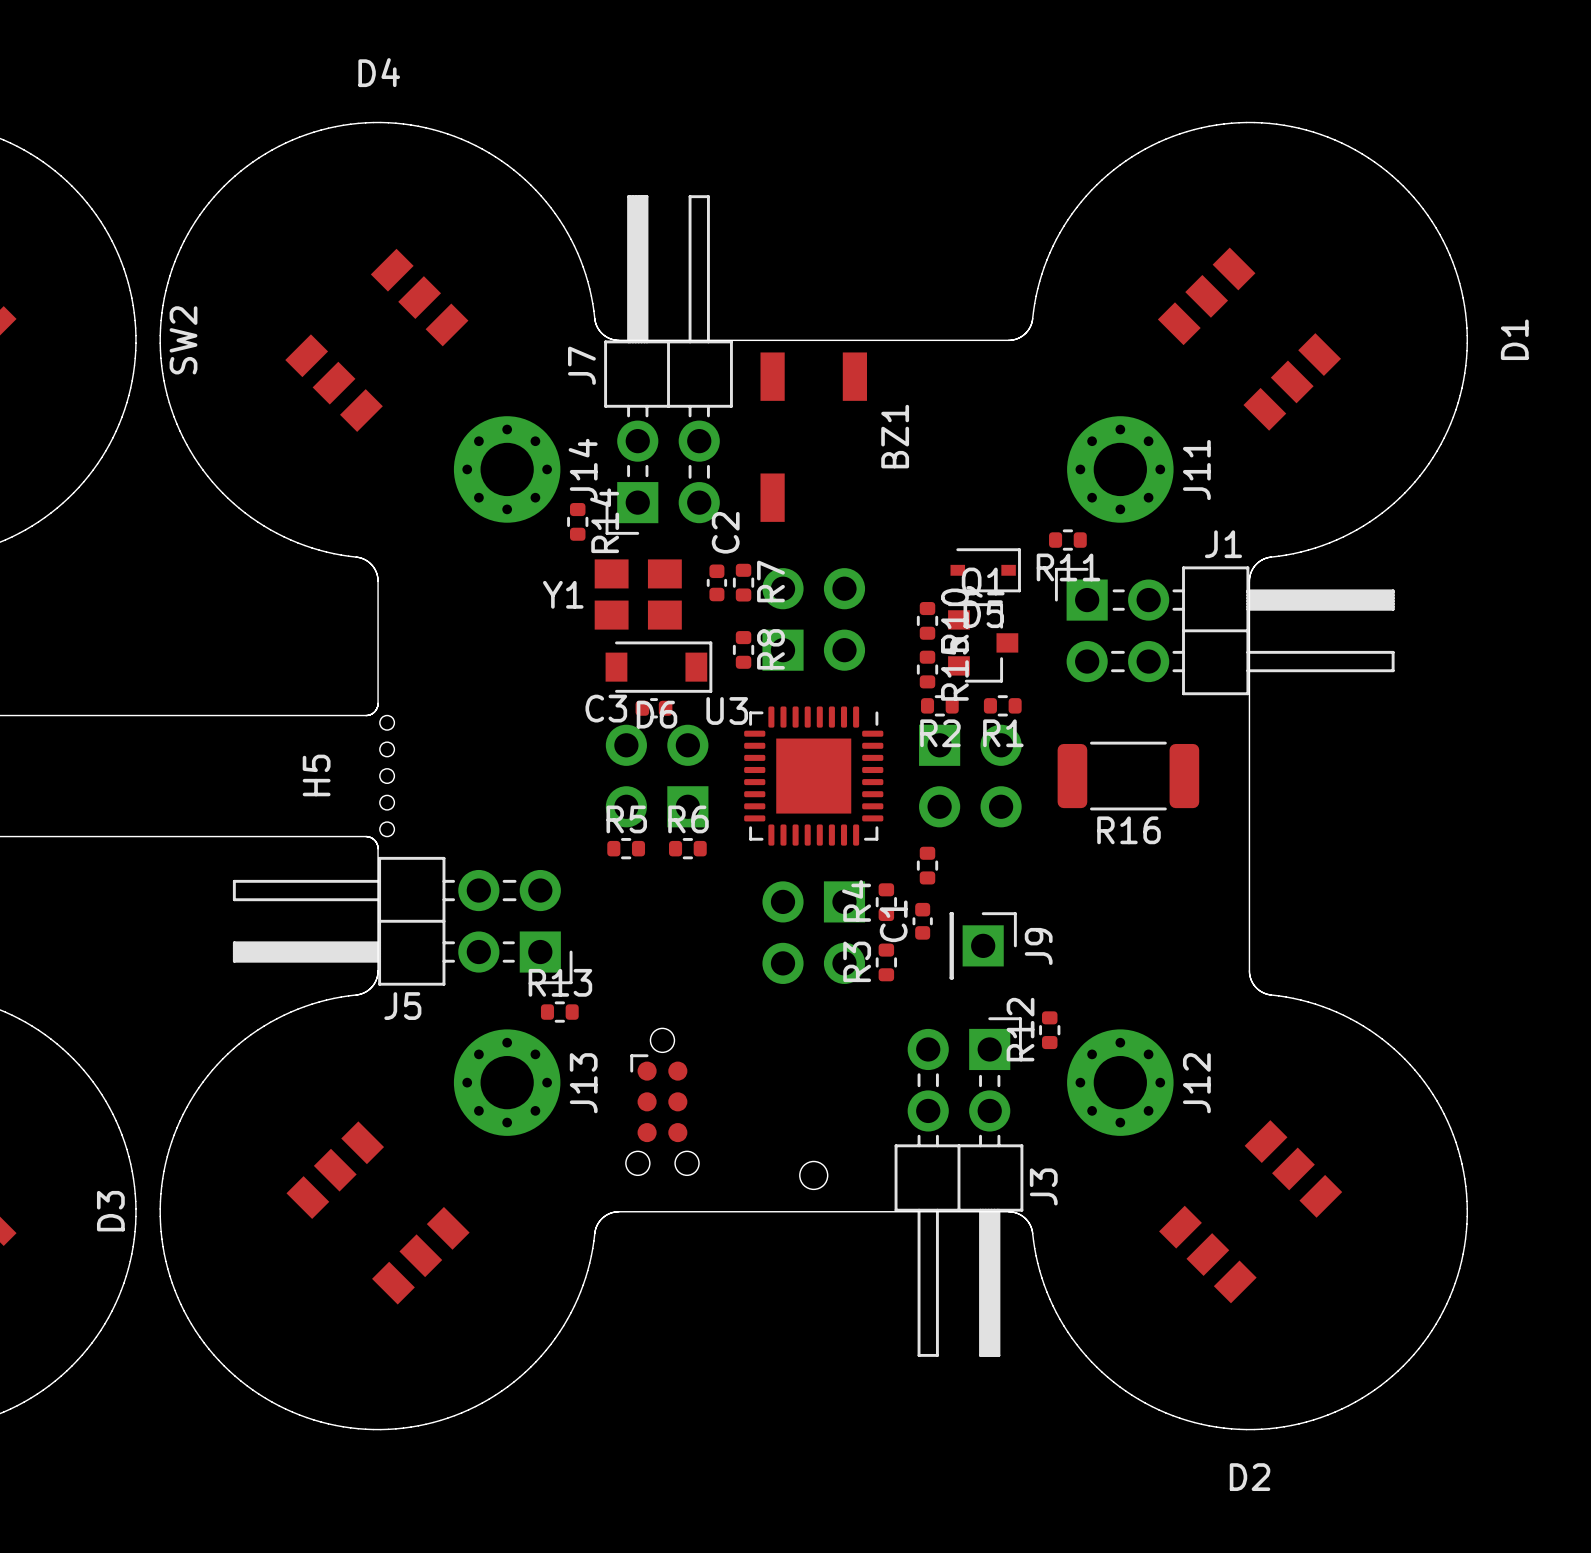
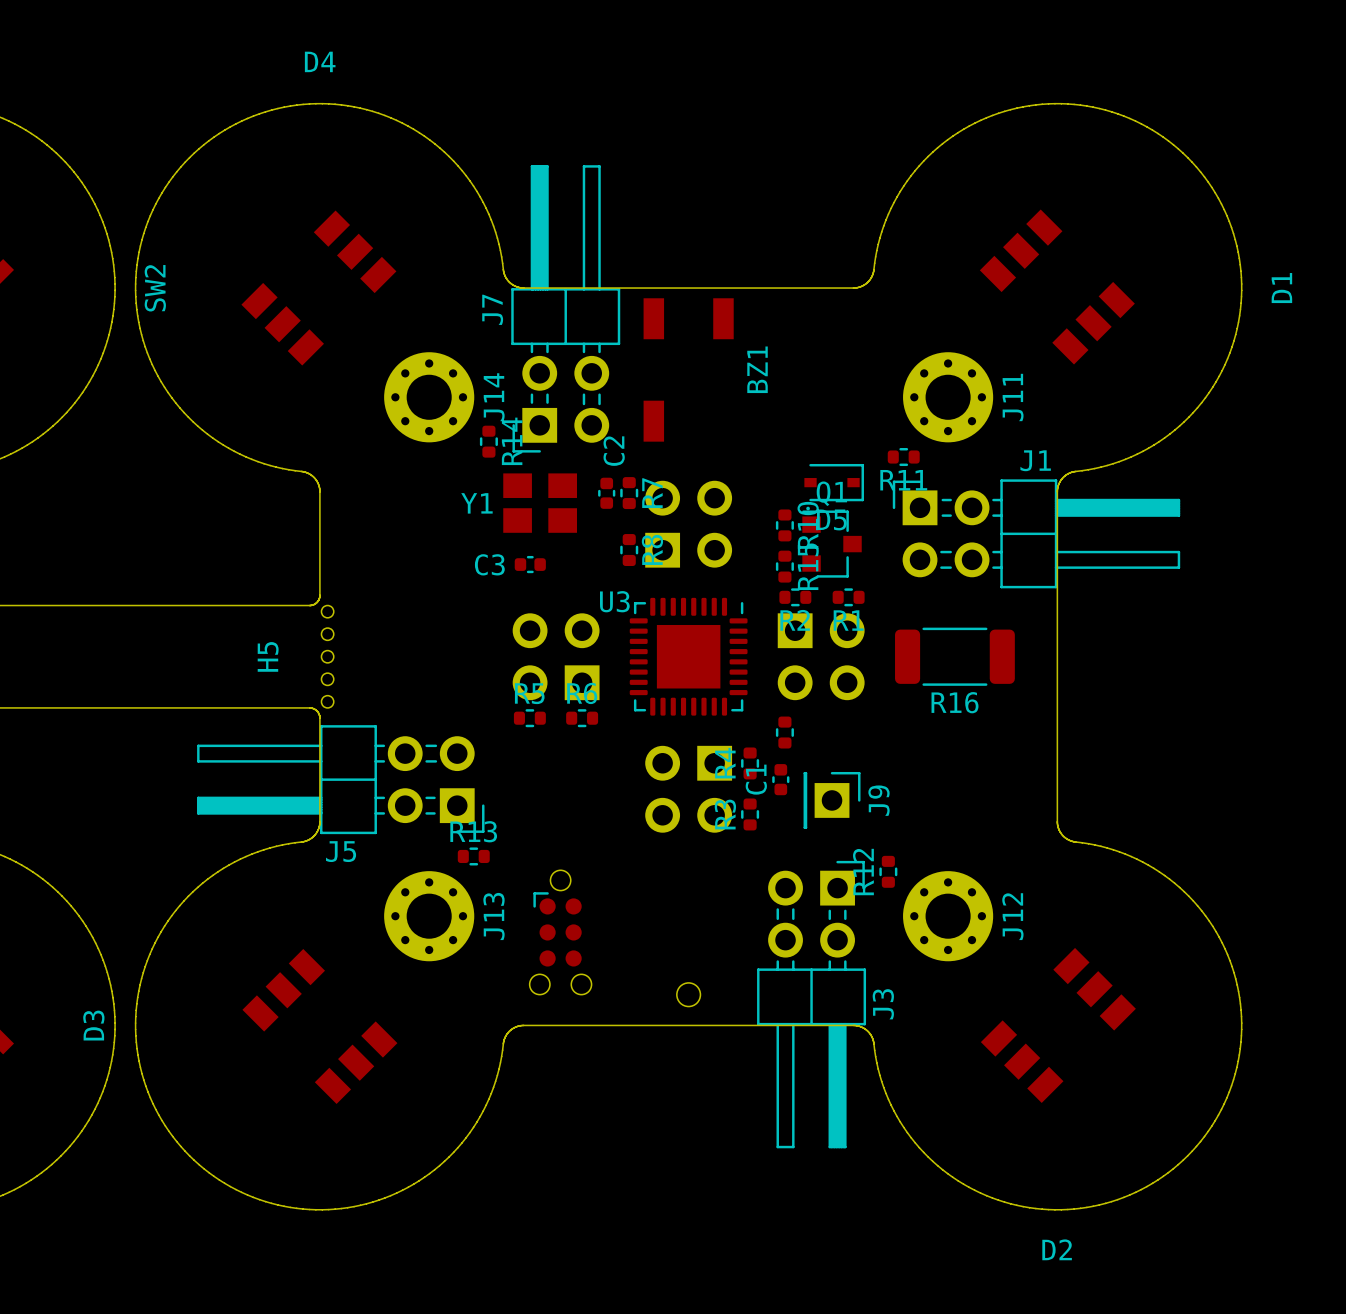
D6: (658, 667) -> none
C3 position: (653, 708) -> (530, 564)

